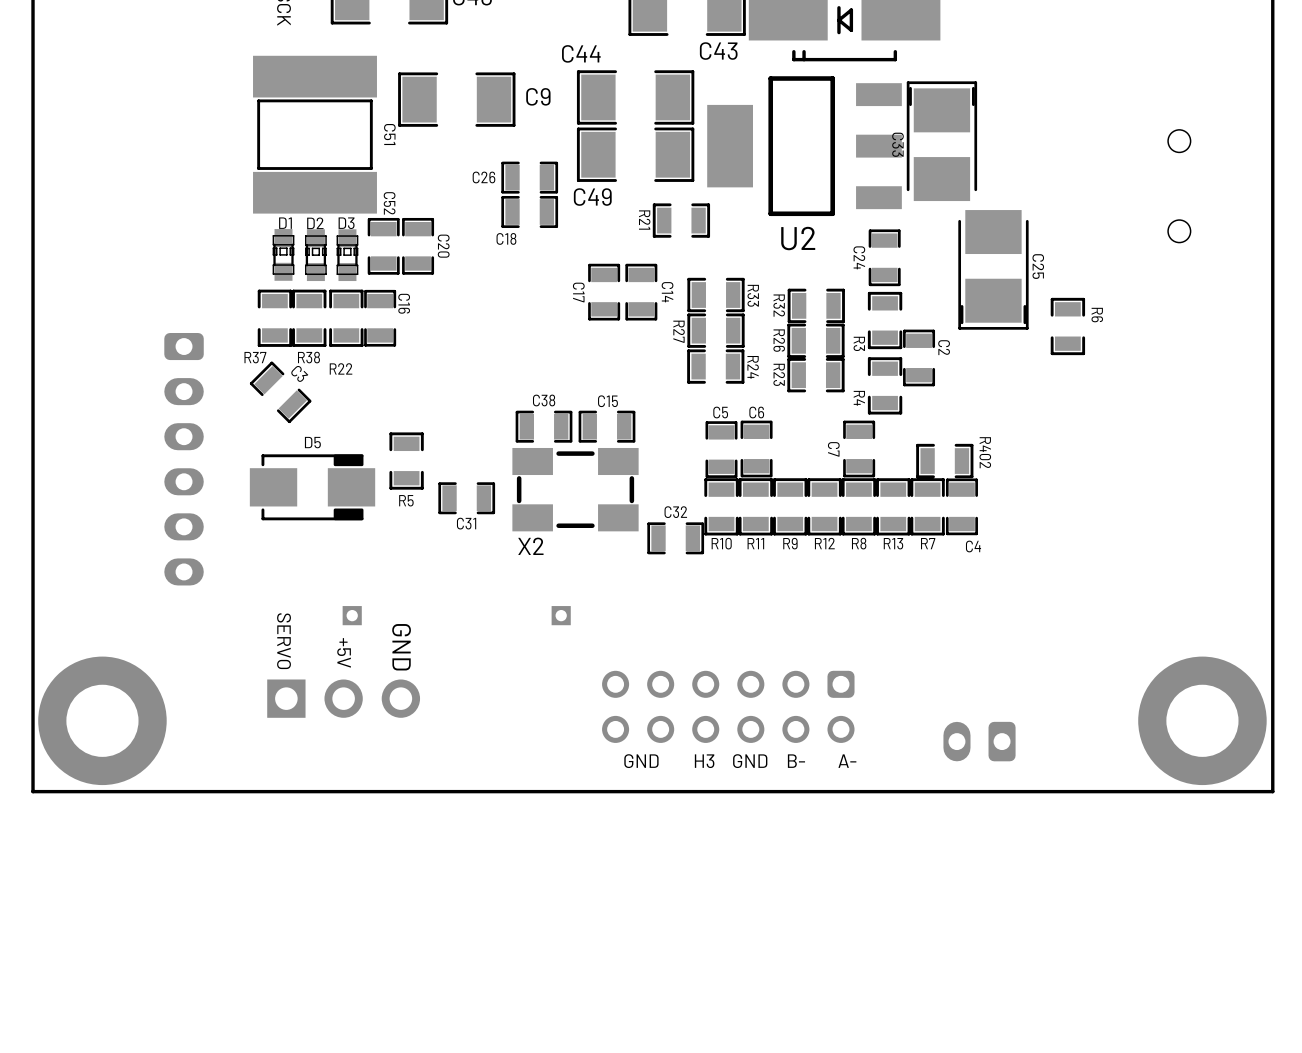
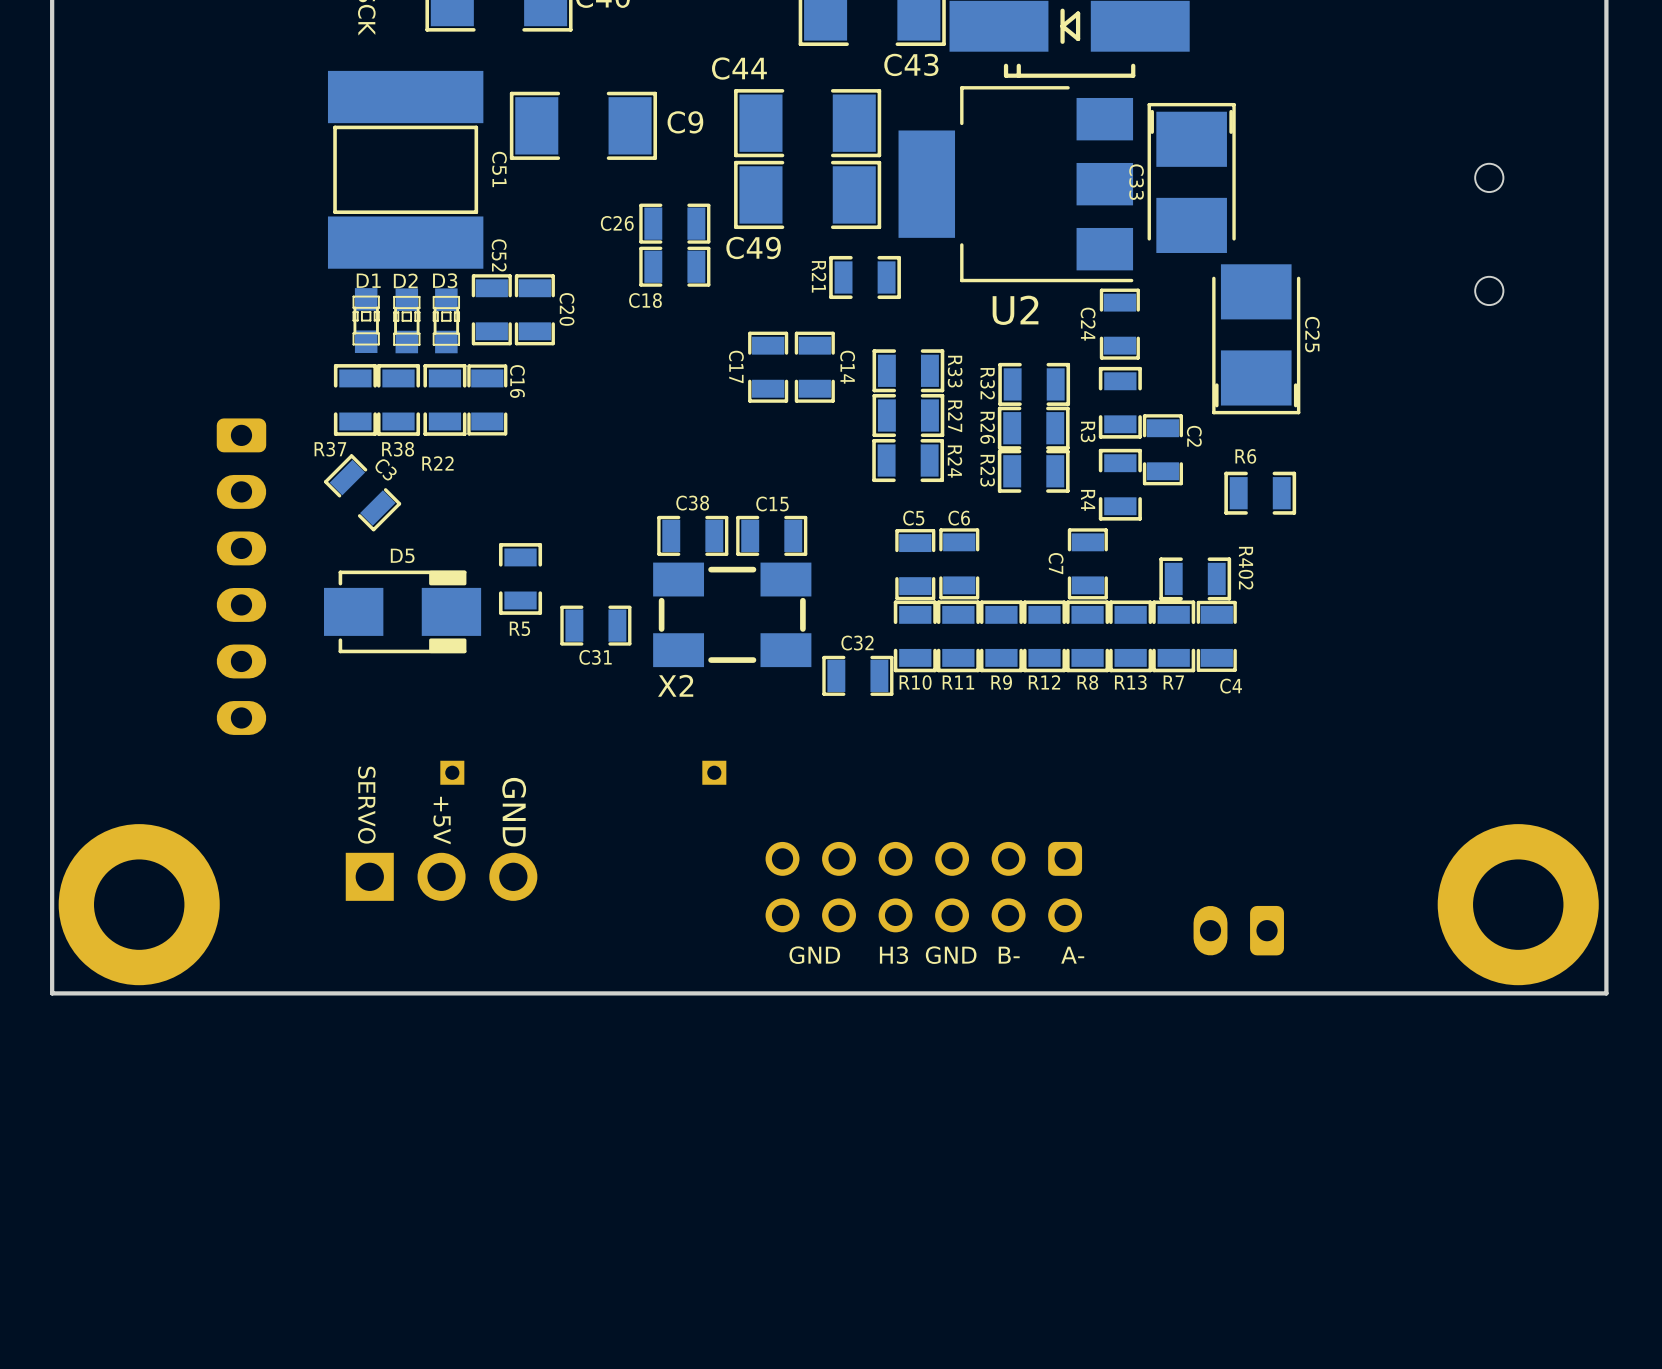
U2 footprint: [707, 76, 902, 217] -> [898, 86, 1134, 283]
R6 rotation: 0° (1067, 326) -> 90° clockwise (1260, 493)
R6 position: (1067, 326) -> (1260, 493)
R27 name position: R27 (679, 331) -> R27 (955, 416)

